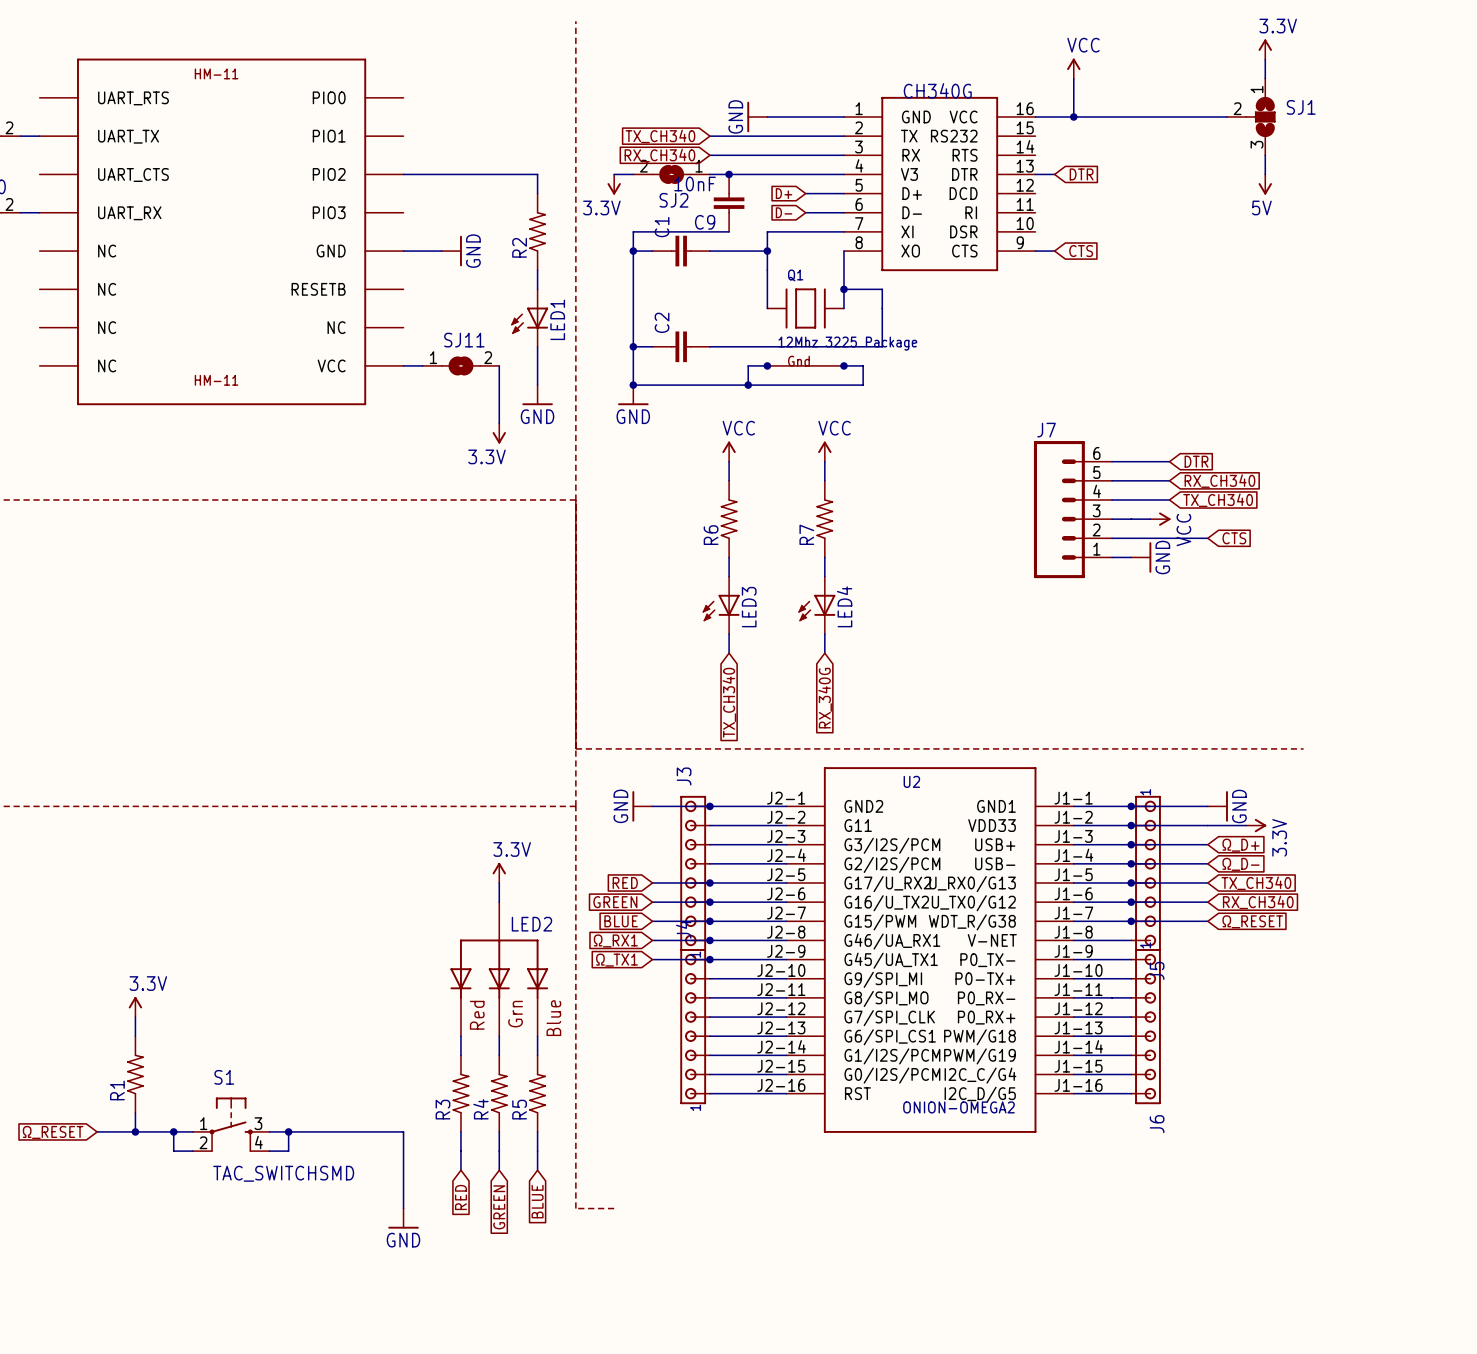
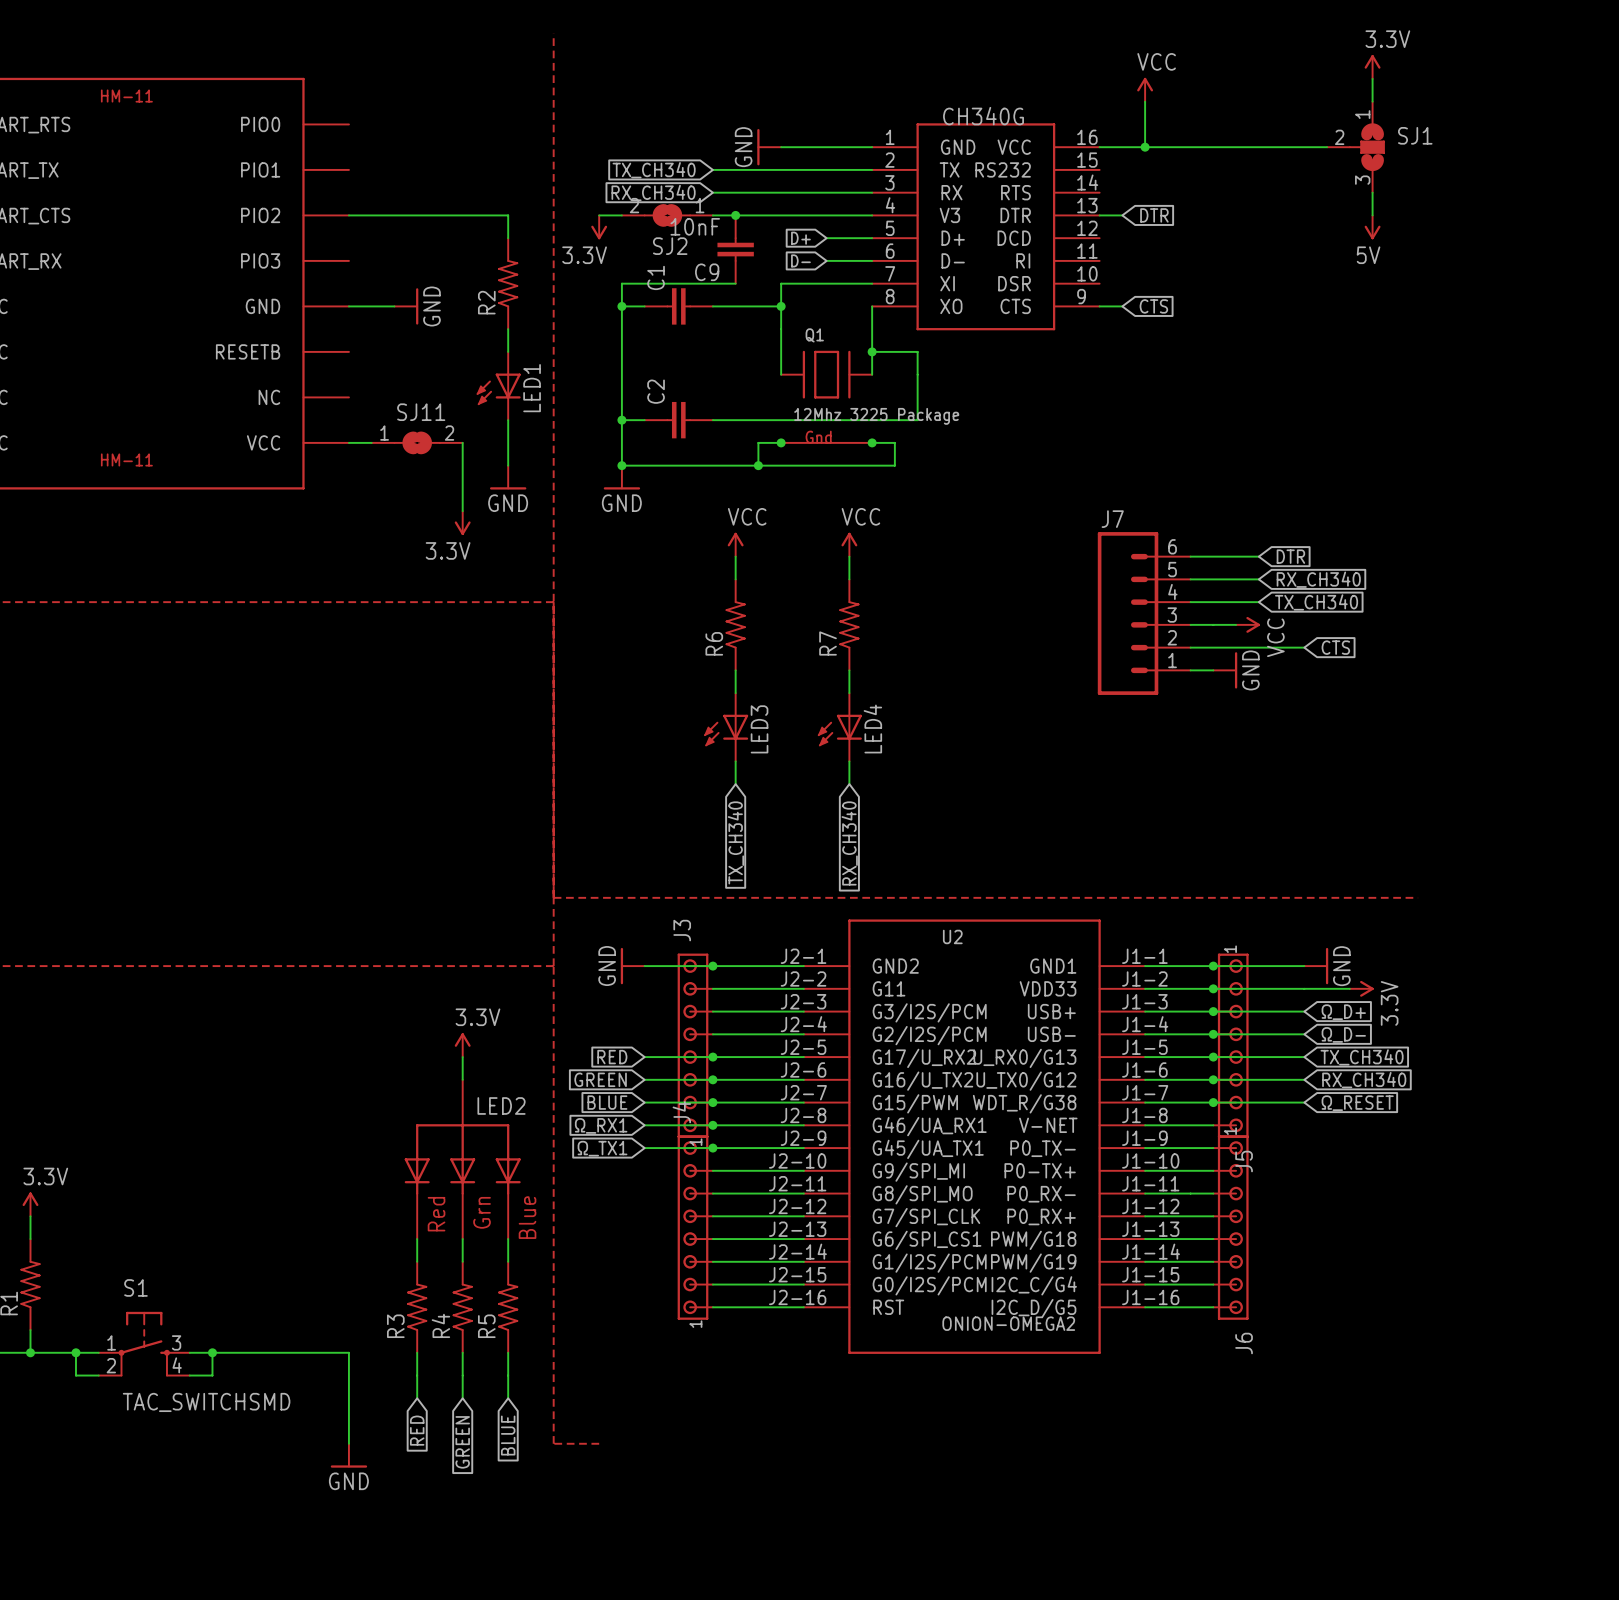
global label: RX_340G (825, 698) -> RX_CH340 (849, 843)

